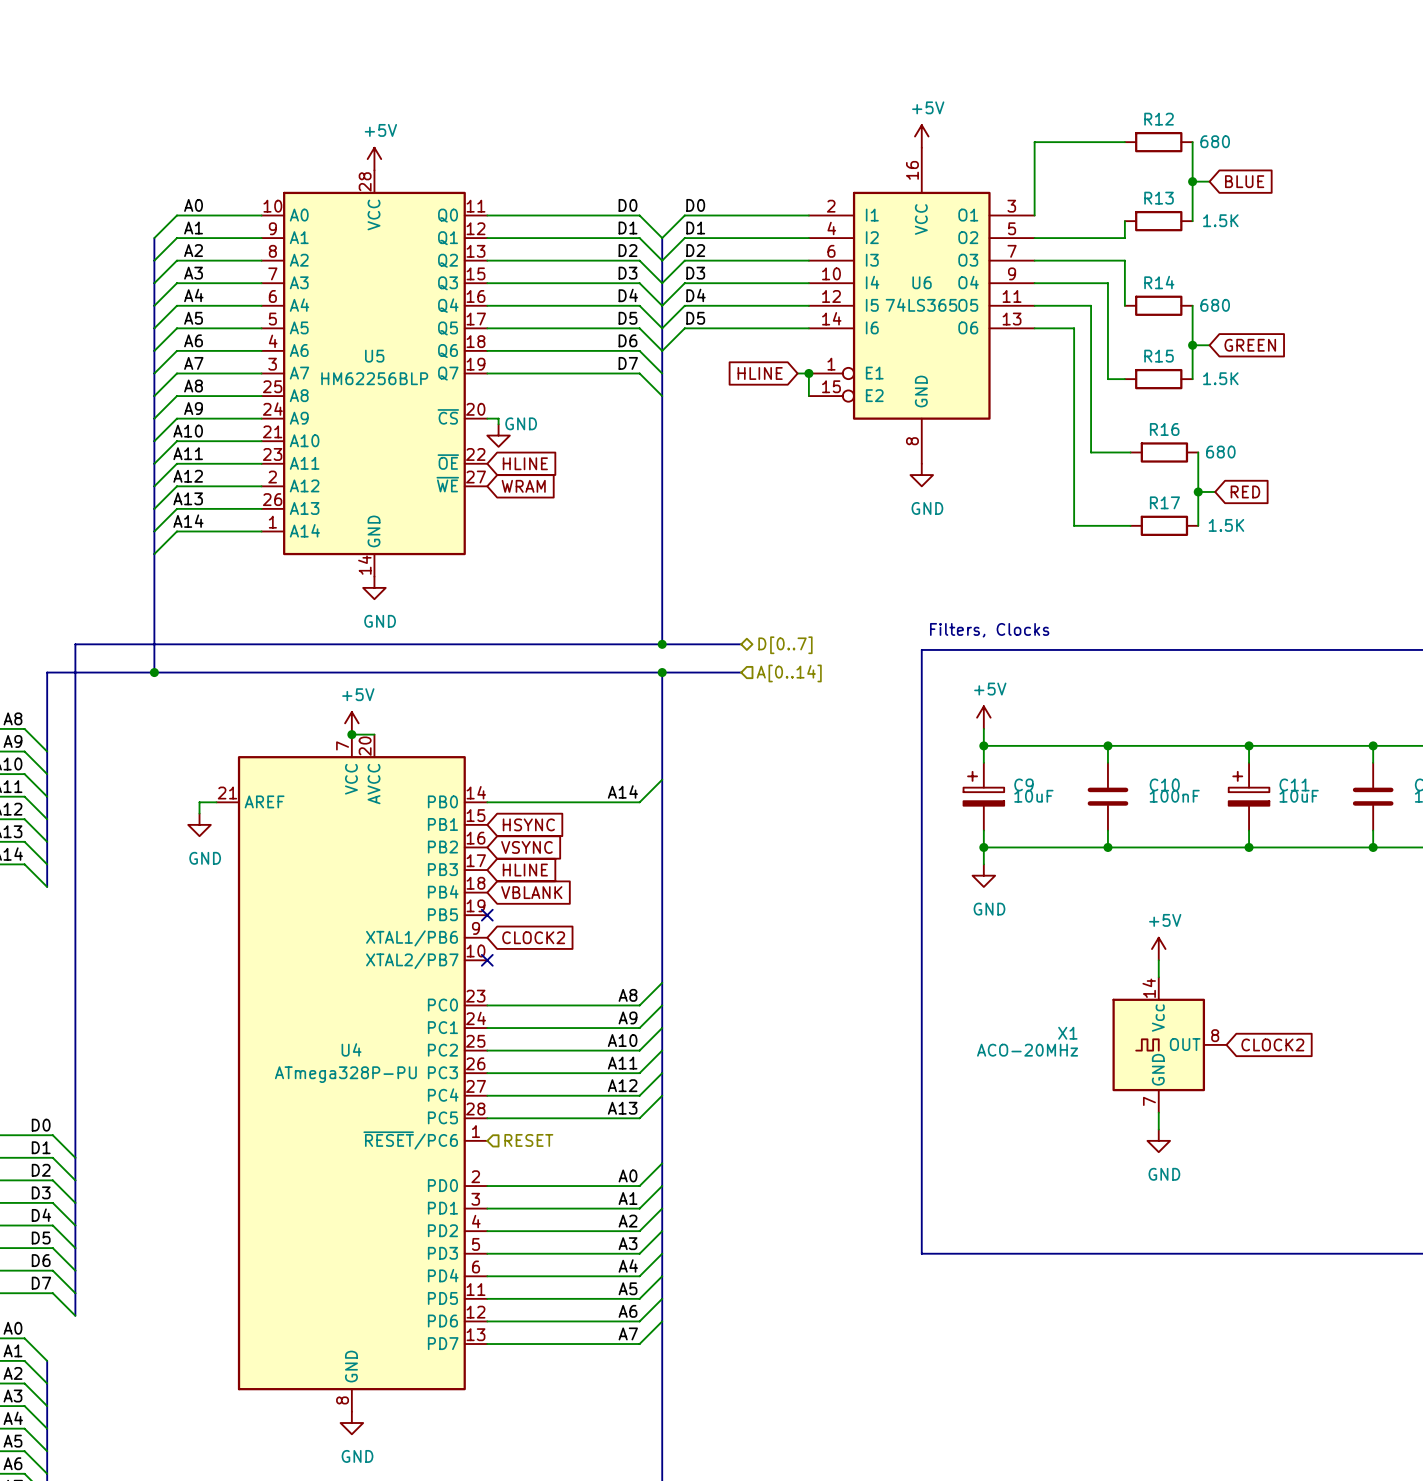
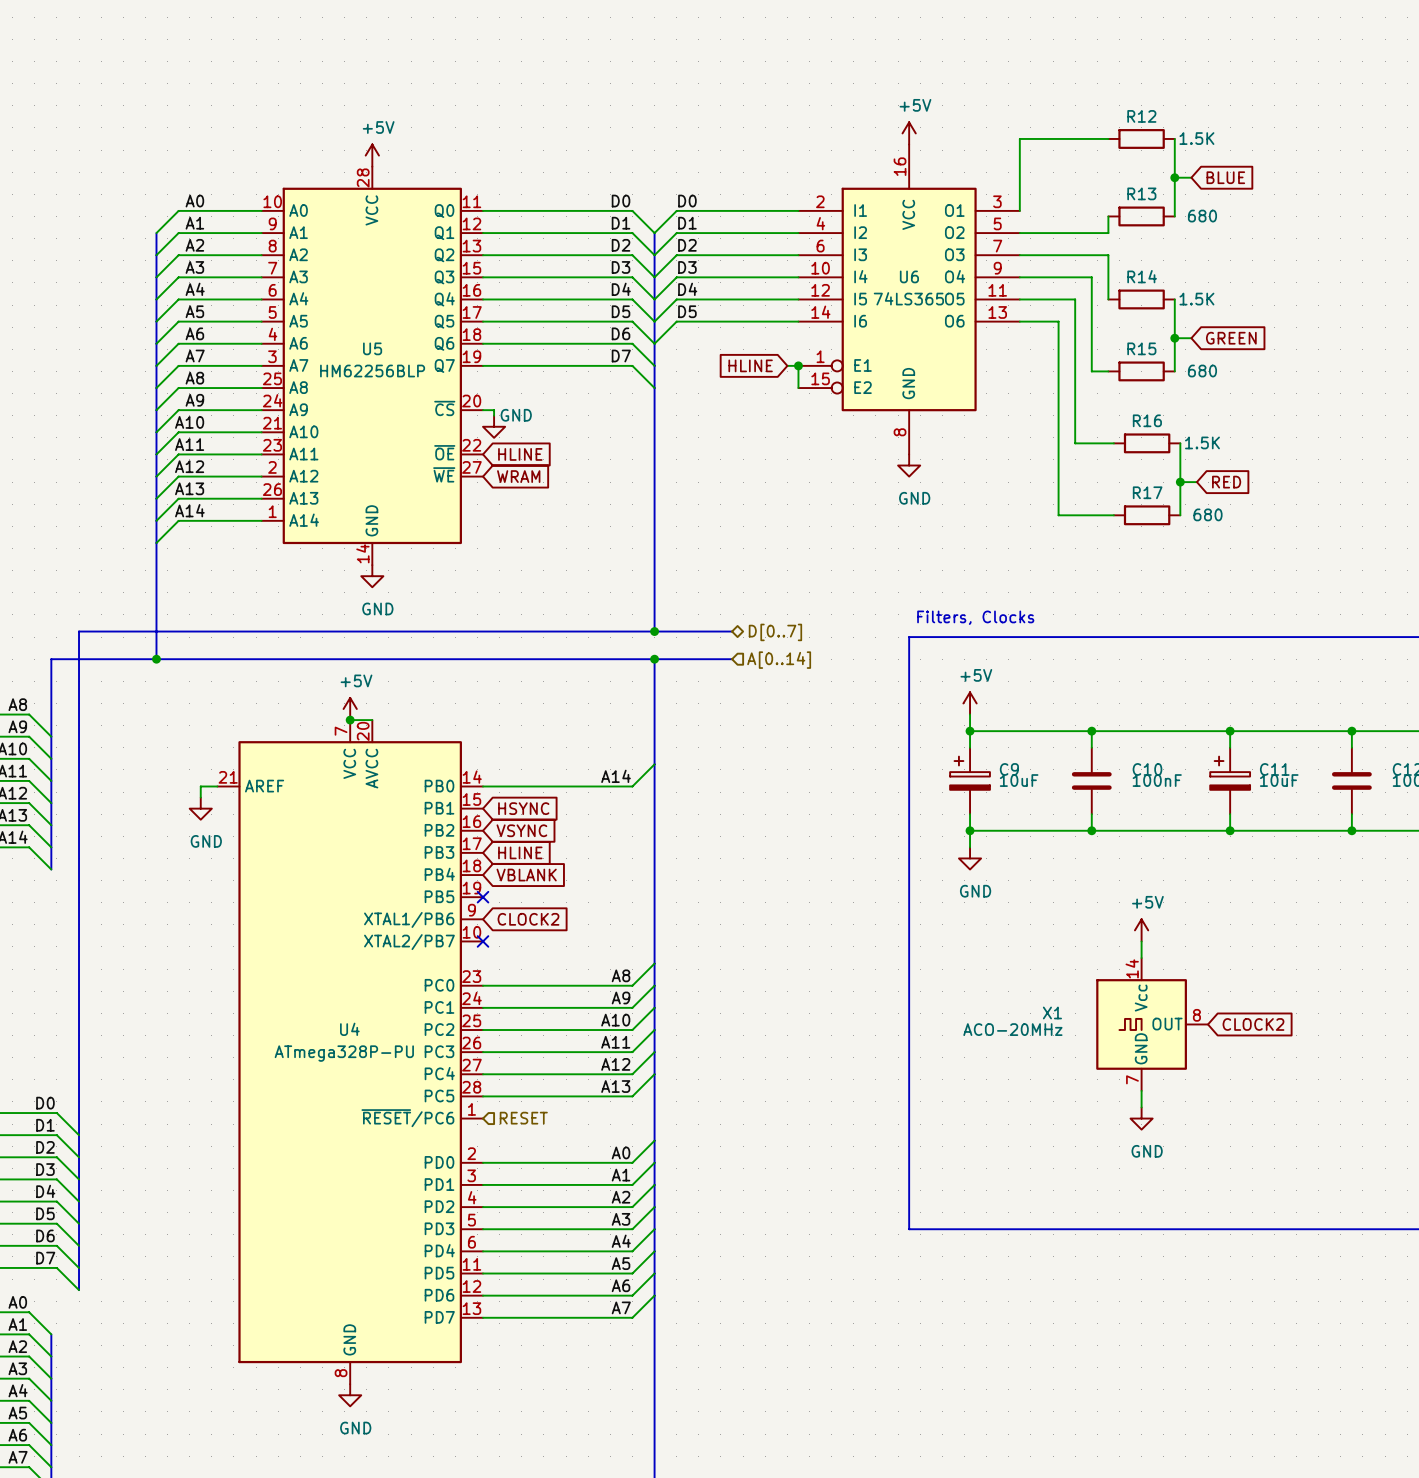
R12 value: 680 (1215, 141) -> 1.5K (1196, 138)
R13 value: 1.5K (1220, 220) -> 680 (1202, 216)
R14 value: 680 (1215, 305) -> 1.5K (1196, 299)
R15 value: 1.5K (1220, 378) -> 680 (1202, 371)
R16 value: 680 (1220, 452) -> 1.5K (1202, 442)
R17 value: 1.5K (1226, 525) -> 680 (1208, 514)

